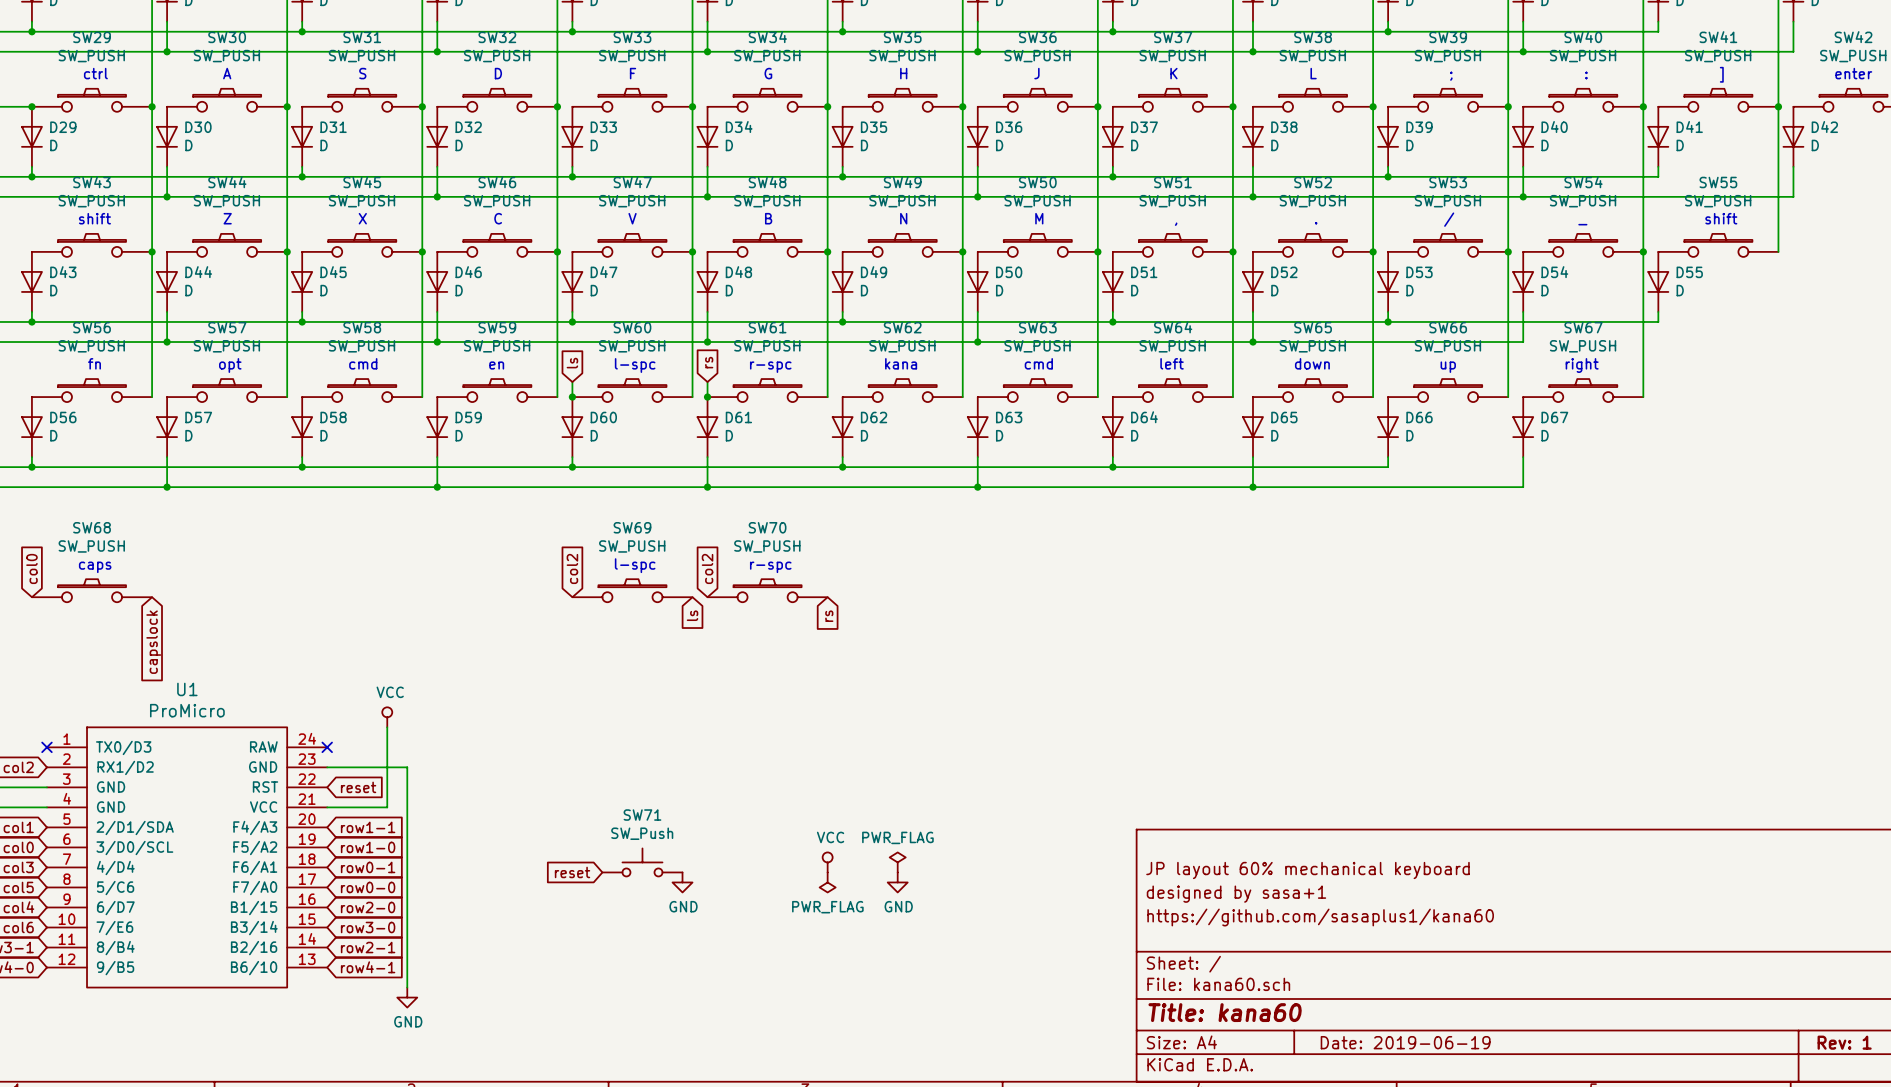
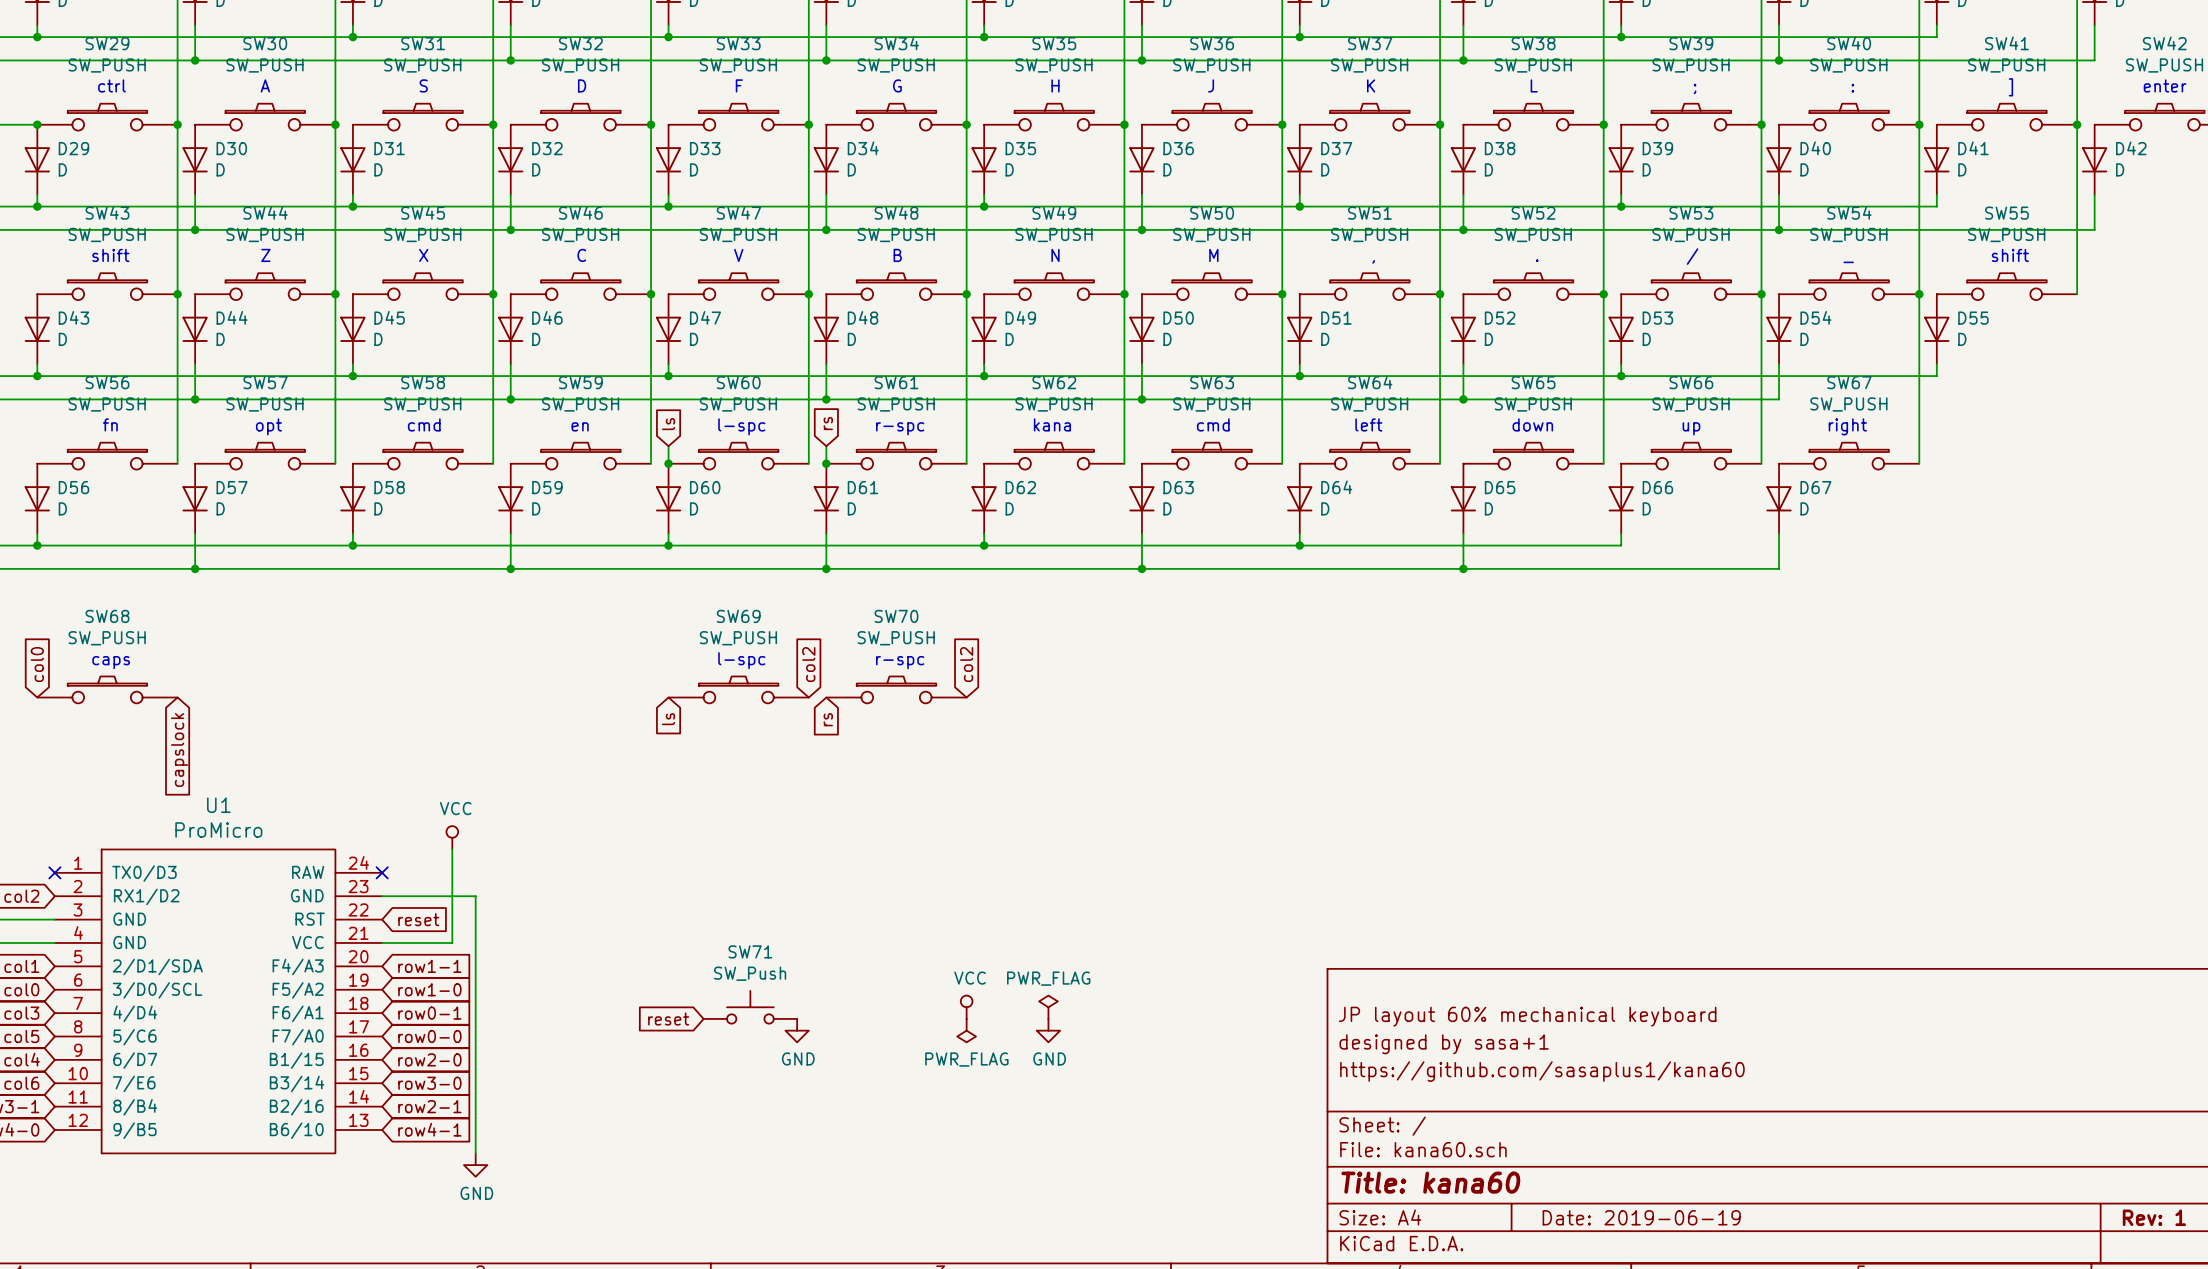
global label: col2 (572, 568) -> ls (668, 719)
global label: col2 (707, 568) -> rs (828, 719)
global label: ls (692, 615) -> col2 (808, 664)
global label: rs (829, 616) -> col2 (966, 664)

